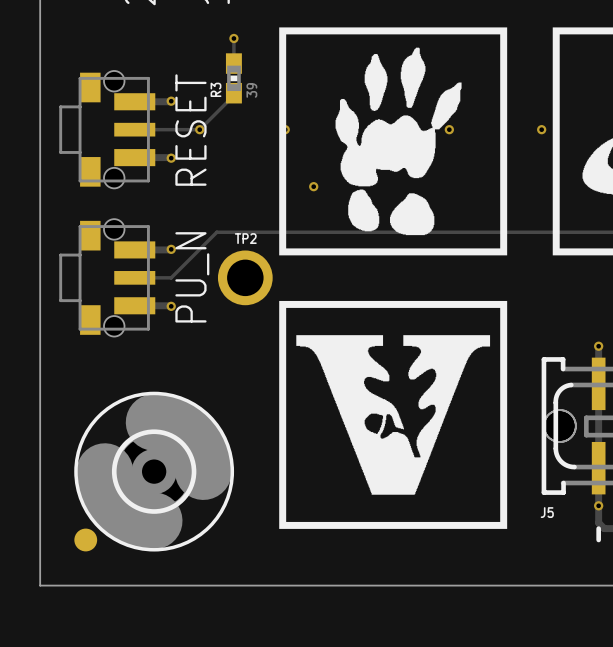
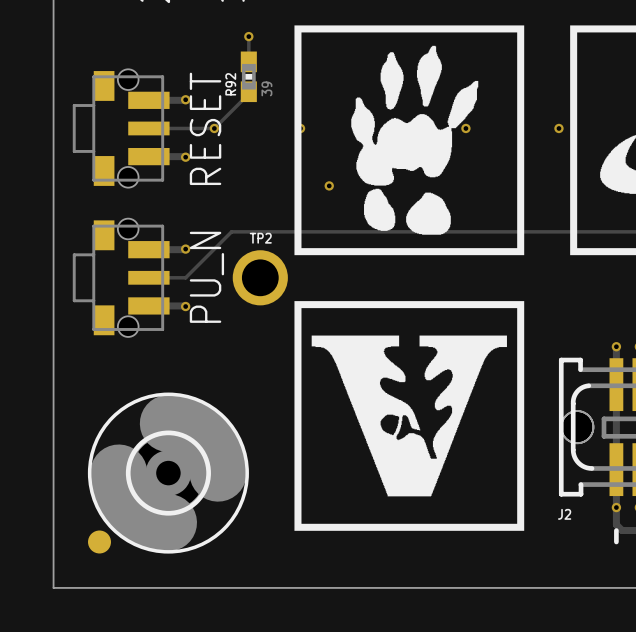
R3 name: R3 (215, 89) -> R92 (230, 84)
J5 name: J5 (547, 512) -> J2 (564, 514)

